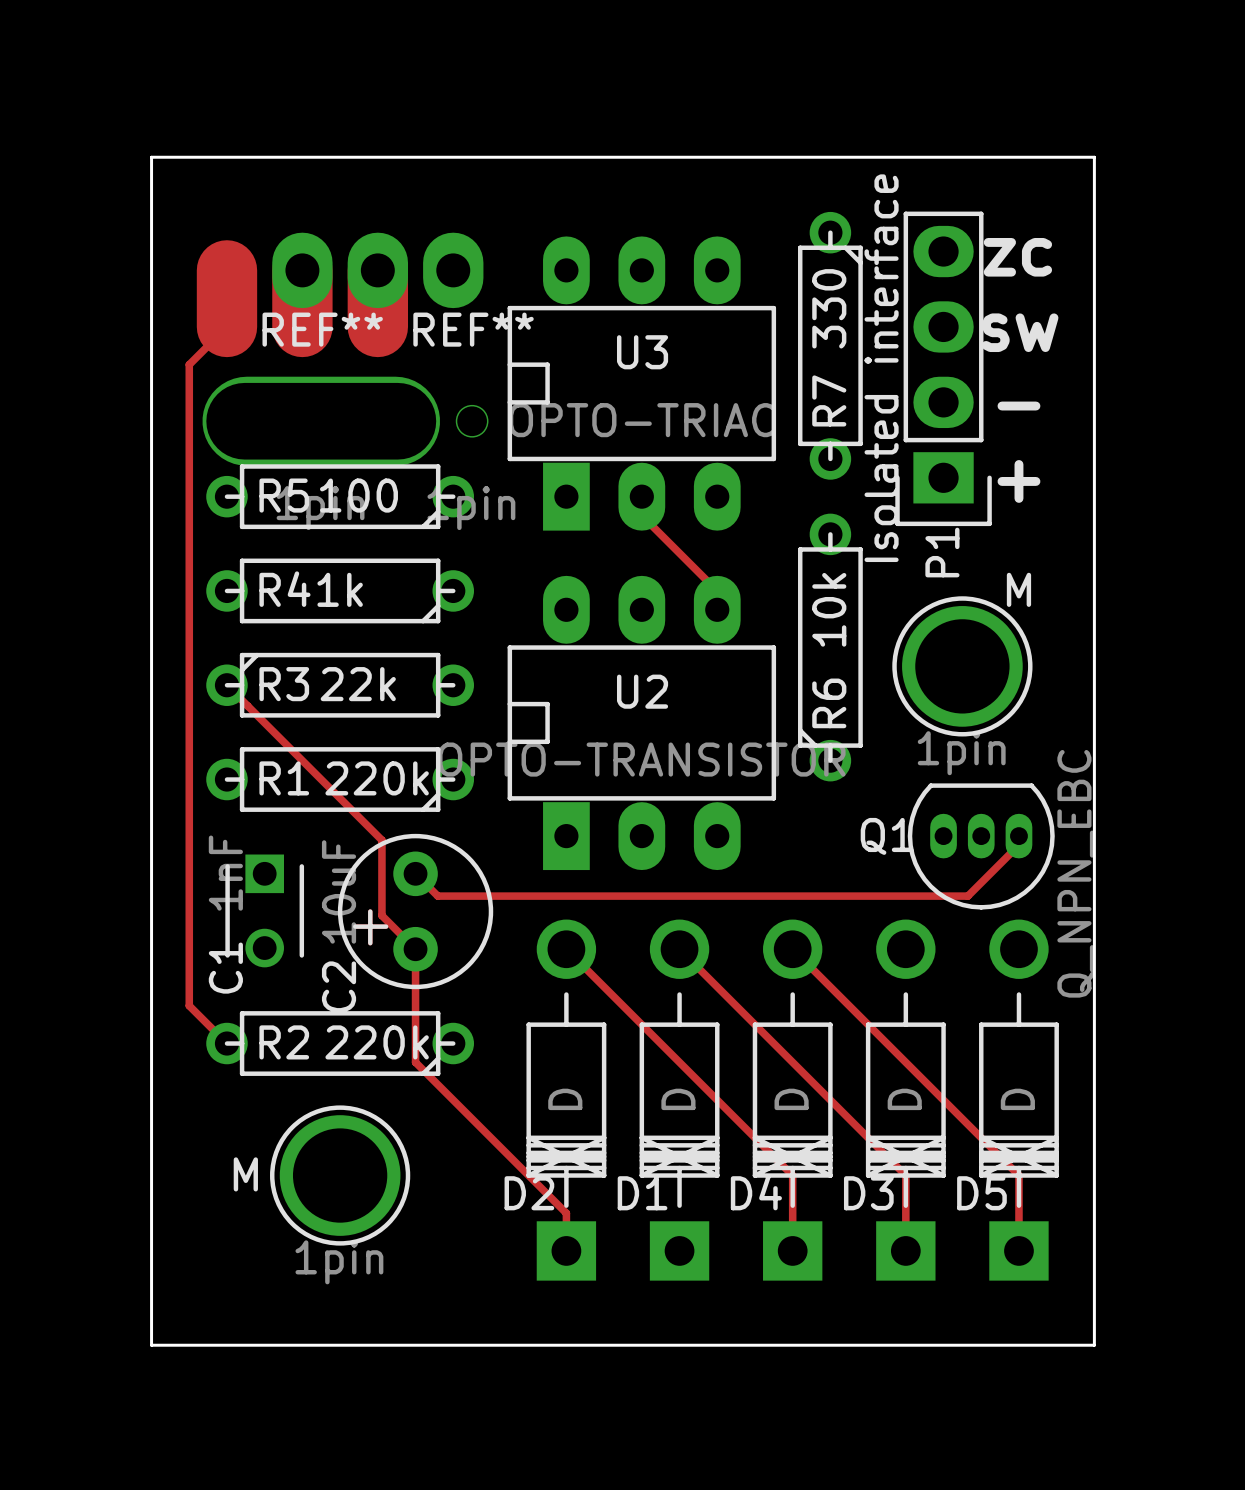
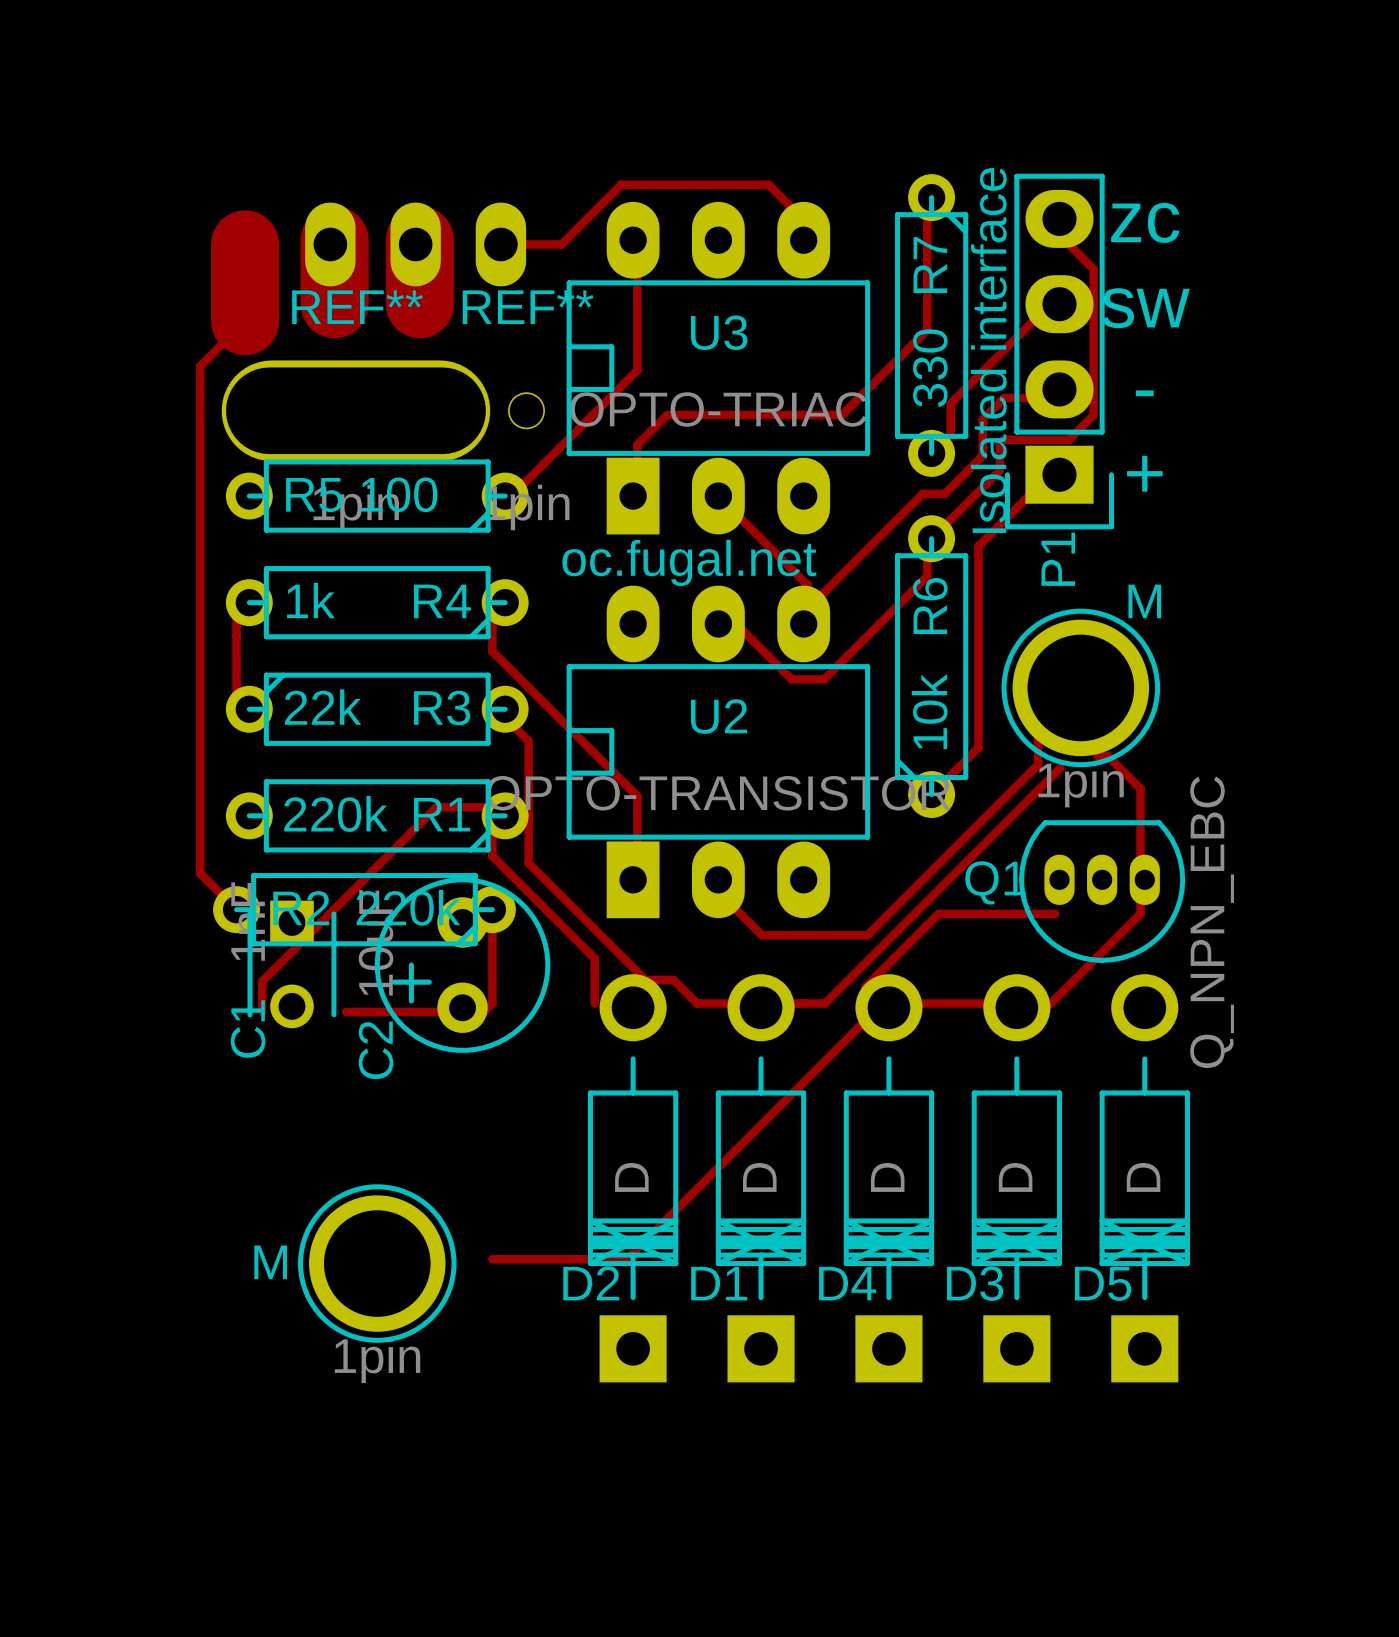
board edge: (151, 157) (151, 1345) (1094, 1345) (1094, 157) (151, 157) -> none
part footprint: [272, 232, 484, 309] -> [305, 202, 527, 287]
track: none -> (927, 201) (927, 329) (842, 415) (667, 415) (637, 444) (637, 491)
track: none -> (1046, 227) (1051, 227) (1093, 269) (1093, 415) (1069, 439) (1004, 439) (999, 444) (999, 470) (927, 542) (927, 576) (824, 679) (791, 679) (740, 628) (722, 628)
track: none -> (637, 235) (637, 370) (524, 483) (509, 483) (492, 500)
track: none -> (807, 235) (807, 224) (768, 184) (621, 184) (561, 244) (500, 244)
track: (226, 270) (226, 326) (189, 364) (189, 1005) (226, 1043) -> none
track: none -> (245, 244) (245, 321) (200, 366) (200, 873) (236, 909)
R7 value position: 330 (829, 308) -> 330 (930, 368)
track: none -> (1046, 312) (1041, 312) (950, 403) (950, 434) (927, 457)
R7 name position: R7 (829, 400) -> R7 (930, 265)
track: none -> (1046, 397) (1004, 397) (982, 419) (982, 455) (944, 493) (922, 493) (807, 608)
track: none -> (722, 479) (722, 500) (807, 585) (807, 628)
track: none -> (1046, 483) (1041, 483) (978, 546) (978, 747) (927, 798)
track: (641, 496) (641, 515) (717, 590) (717, 609) -> none
text: none -> oc.fugal.net (689, 562)
R4 name position: R4 (284, 589) -> R4 (442, 601)
R4 value position: 1k (340, 589) -> 1k (310, 600)
track: none -> (236, 602) (236, 704)
track: none -> (492, 602) (492, 651) (637, 796) (637, 884)
R6 value position: 10k (829, 609) -> 10k (929, 711)
track: none -> (1097, 670) (1087, 670) (1038, 720) (1038, 764) (867, 935) (761, 935) (722, 896) (722, 884)
track: none -> (492, 704) (528, 741) (528, 863) (645, 980) (673, 980) (697, 1003) (824, 1003) (1060, 768)
R3 name position: R3 (284, 684) -> R3 (442, 707)
R3 value position: 22k (358, 684) -> 22k (323, 707)
track: (226, 685) (381, 840) (381, 915) (415, 949) (415, 1062) (566, 1213) (566, 1250) -> none
R6 name position: R6 (829, 703) -> R6 (930, 605)
track: none -> (1097, 756) (1107, 756) (1140, 788) (1140, 913) (1050, 1003) (901, 1003)
R1 name position: R1 (284, 778) -> R1 (442, 814)
R1 value position: 220k (377, 778) -> 220k (335, 813)
track: (1018, 836) (1018, 845) (967, 896) (437, 896) (415, 873) -> none
track: none -> (492, 909) (492, 1003) (483, 1011) (346, 1011)
track: none -> (1055, 913) (938, 913) (865, 987) (865, 1020) (626, 1259) (492, 1259)
track: none -> (594, 1003) (594, 958) (492, 856) (492, 807) (436, 807) (262, 981) (262, 1011)
track: (566, 949) (792, 1175) (792, 1250) -> none
track: (679, 949) (905, 1175) (905, 1250) -> none
track: (792, 949) (1018, 1175) (1018, 1250) -> none
R2 position: (340, 1043) -> (364, 909)

